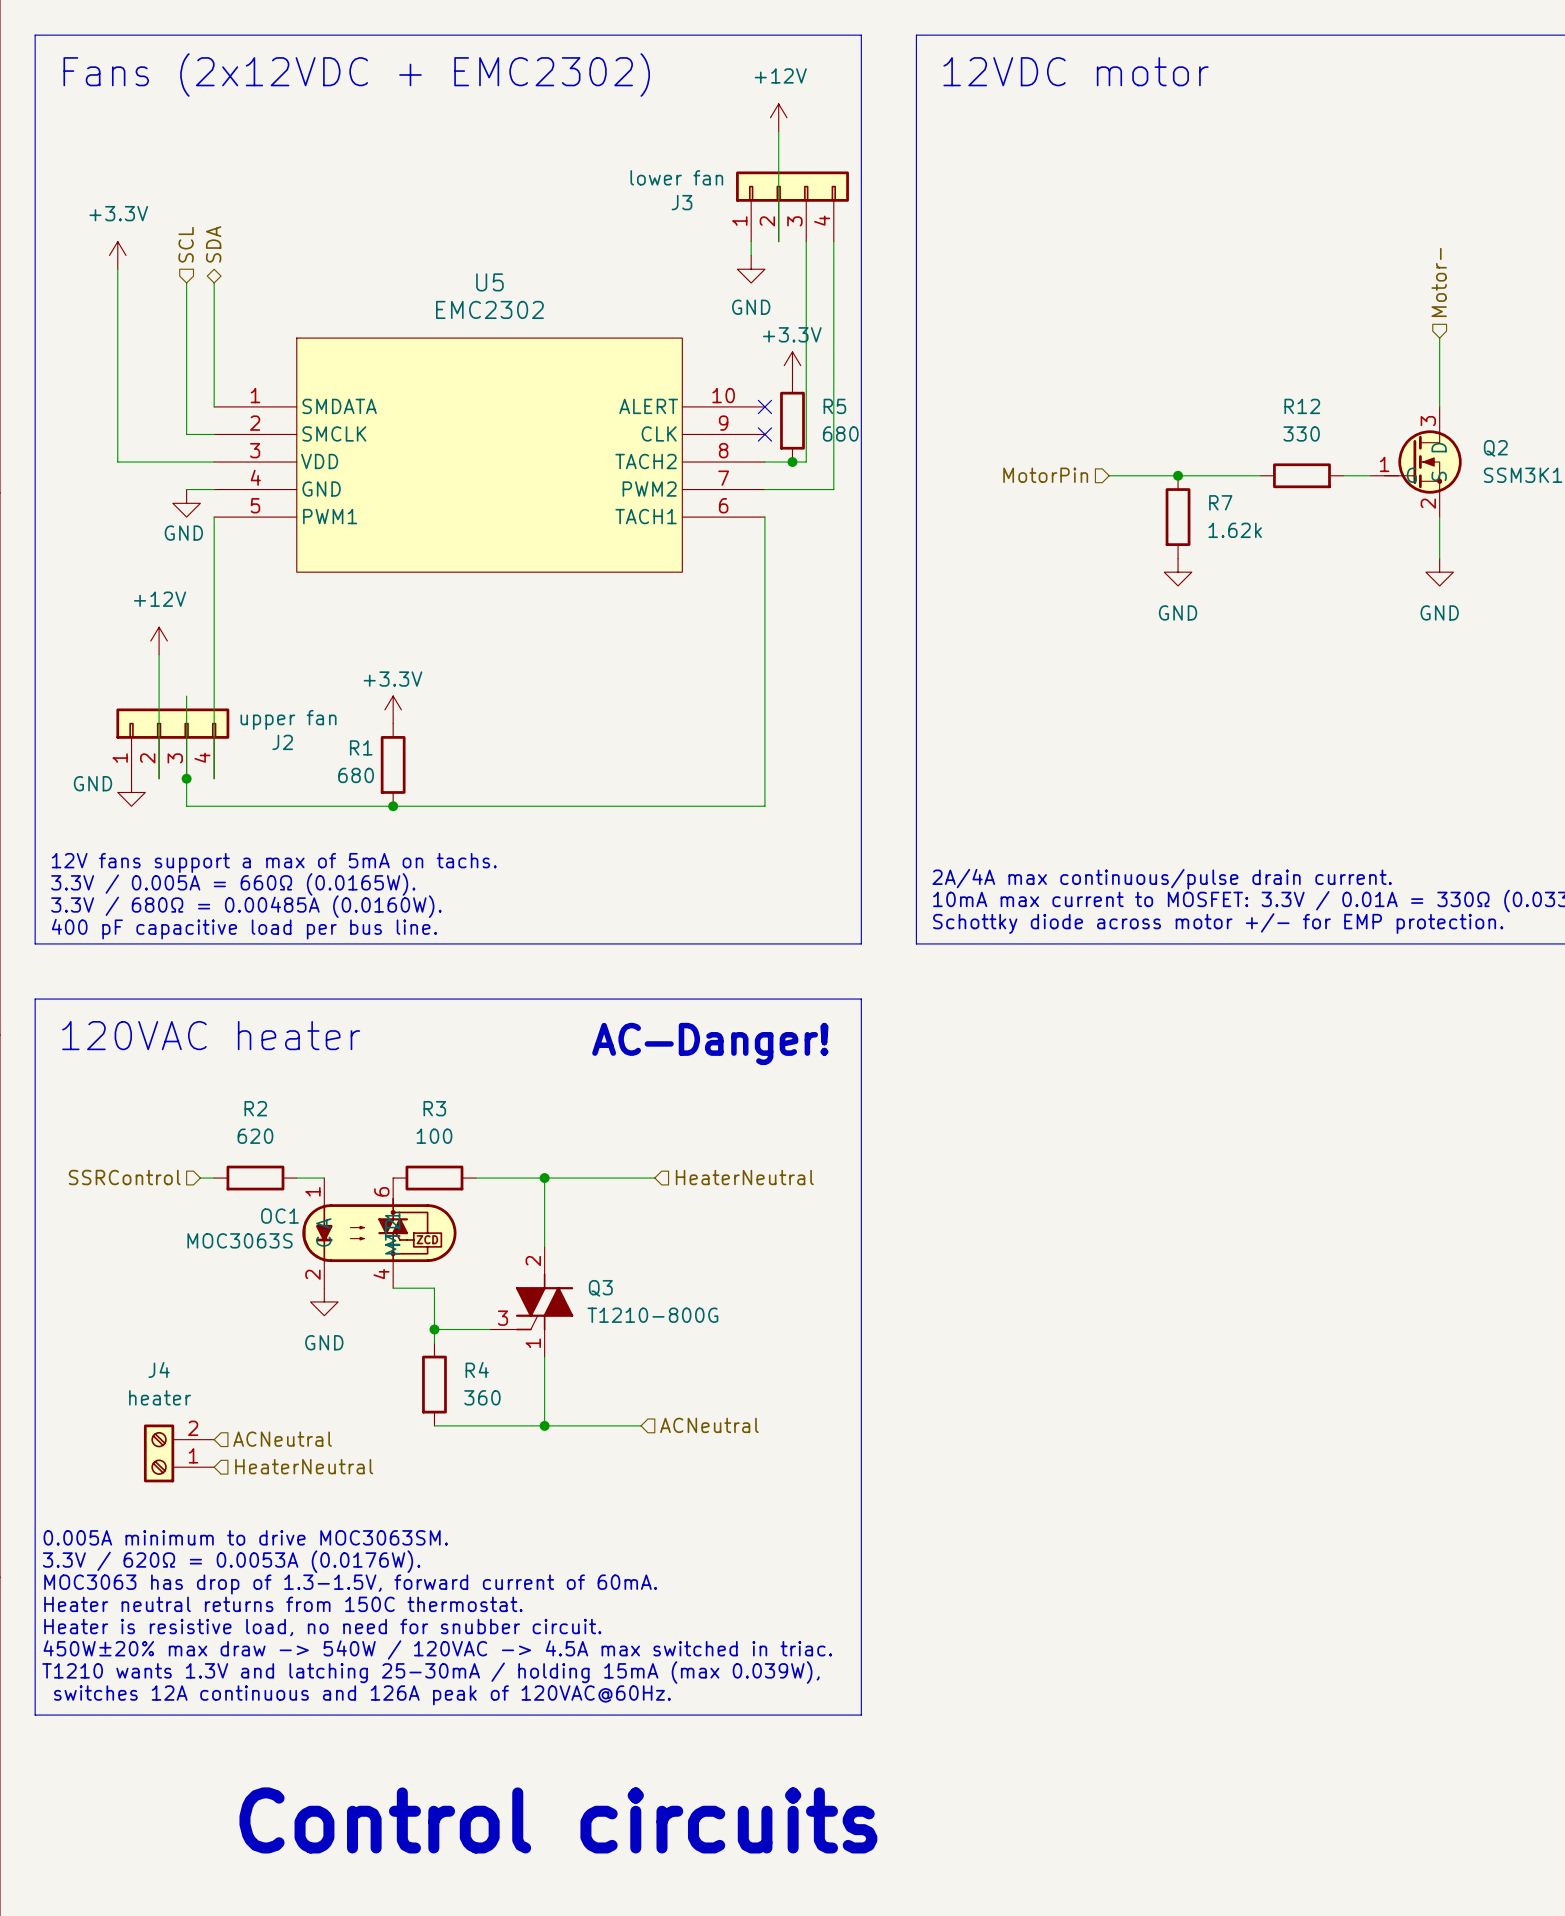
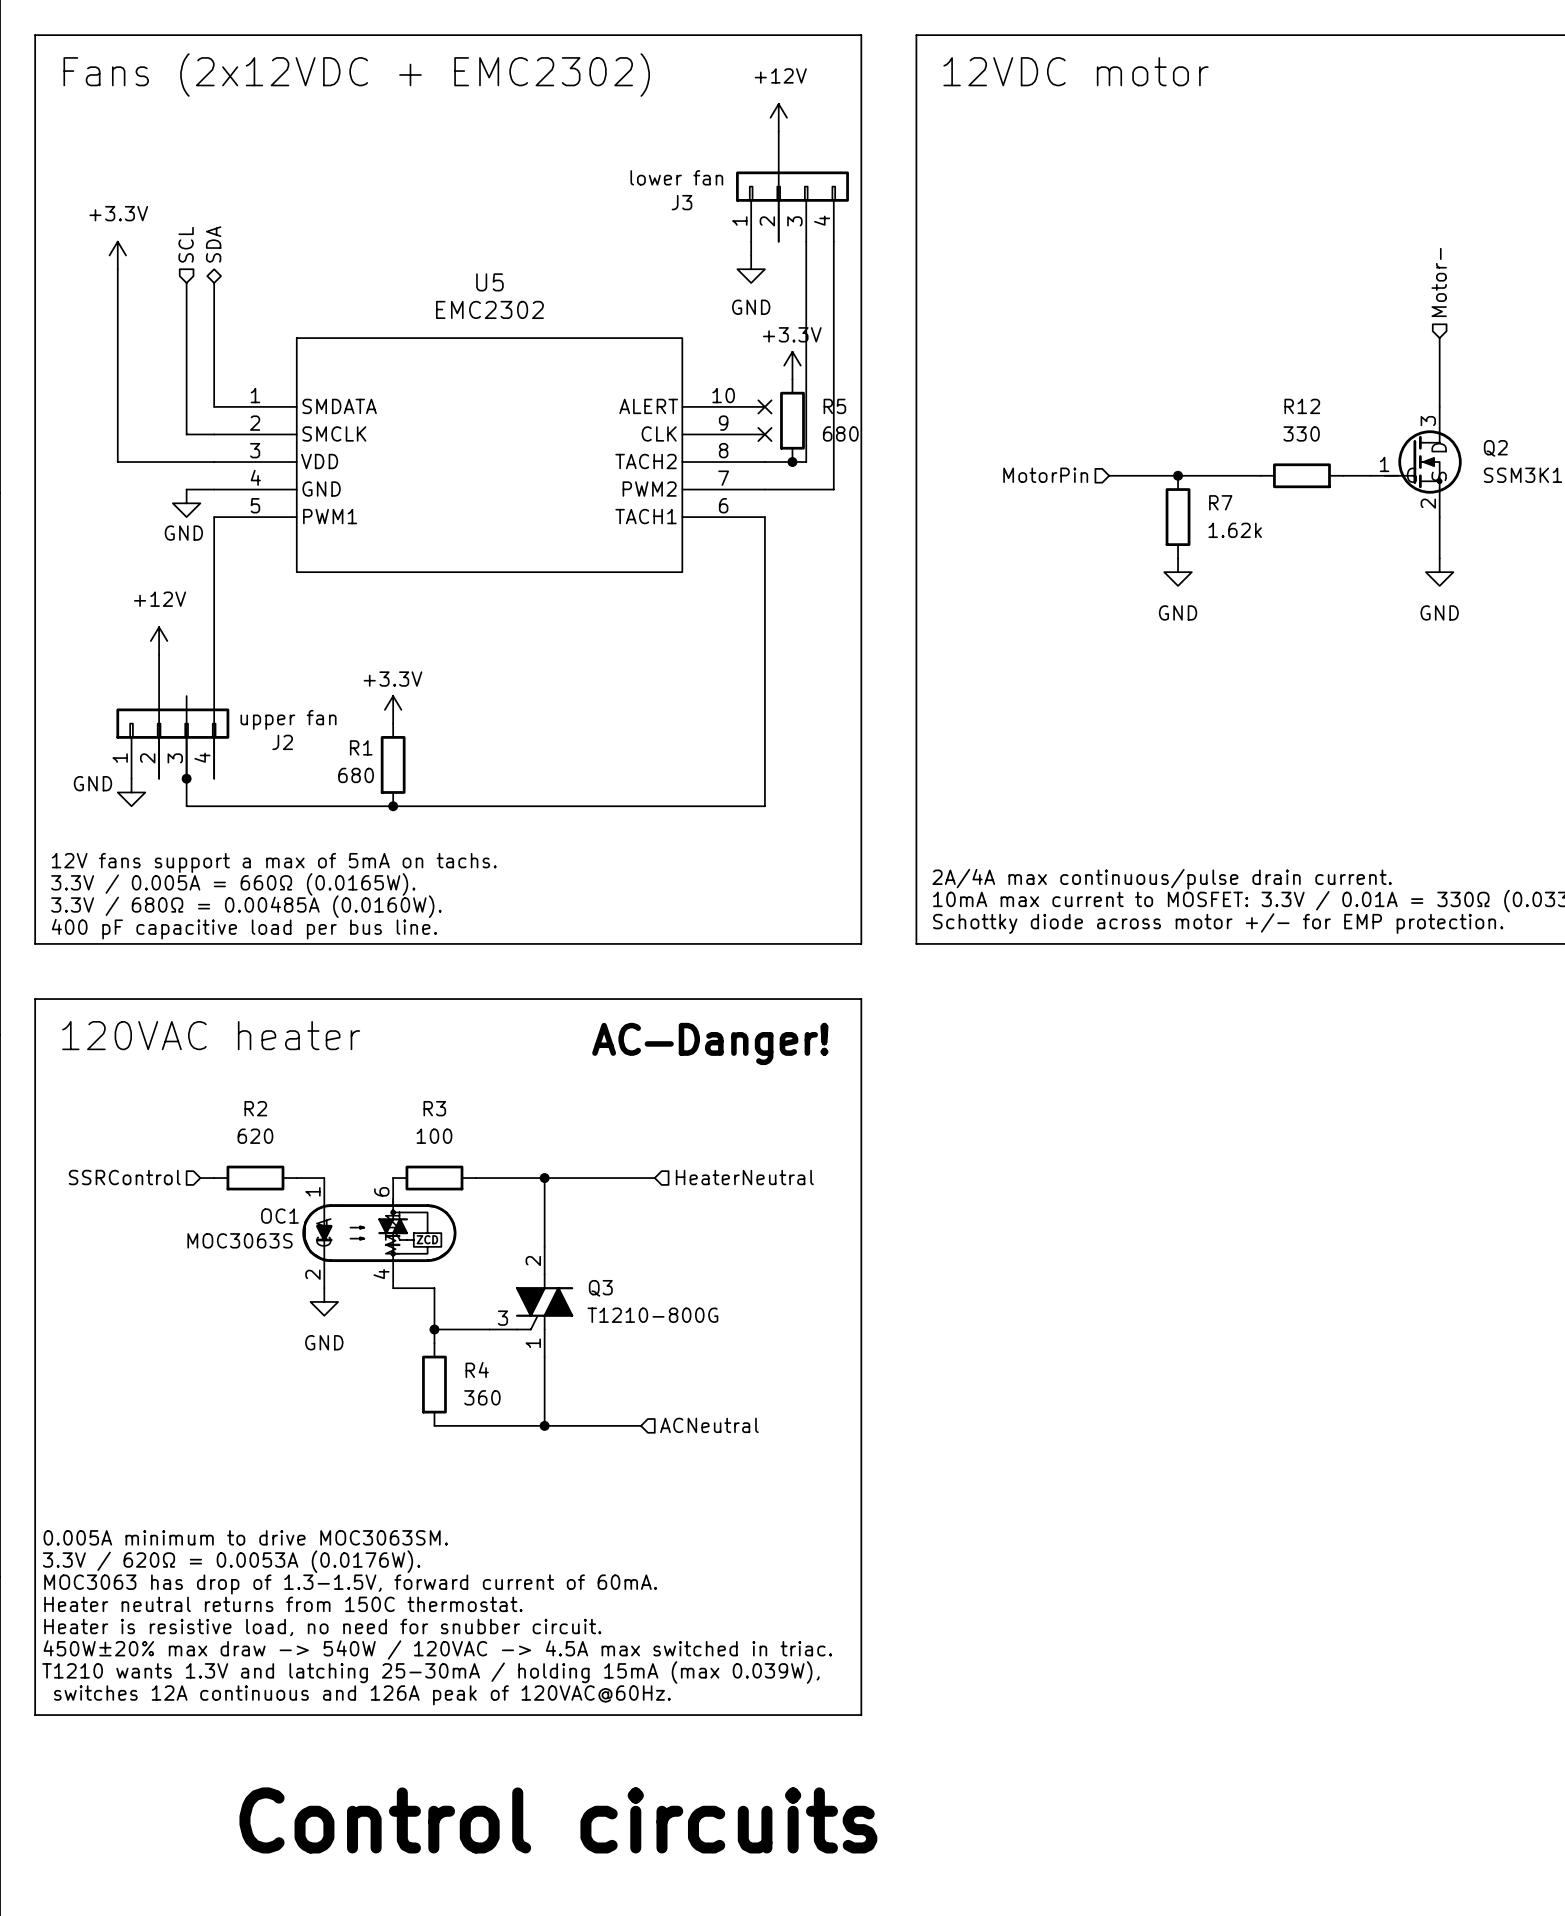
hierarchical label: ACNeutral (282, 1439) -> none
J4: heater (179, 1453) -> none
hierarchical label: HeaterNeutral (304, 1466) -> none

